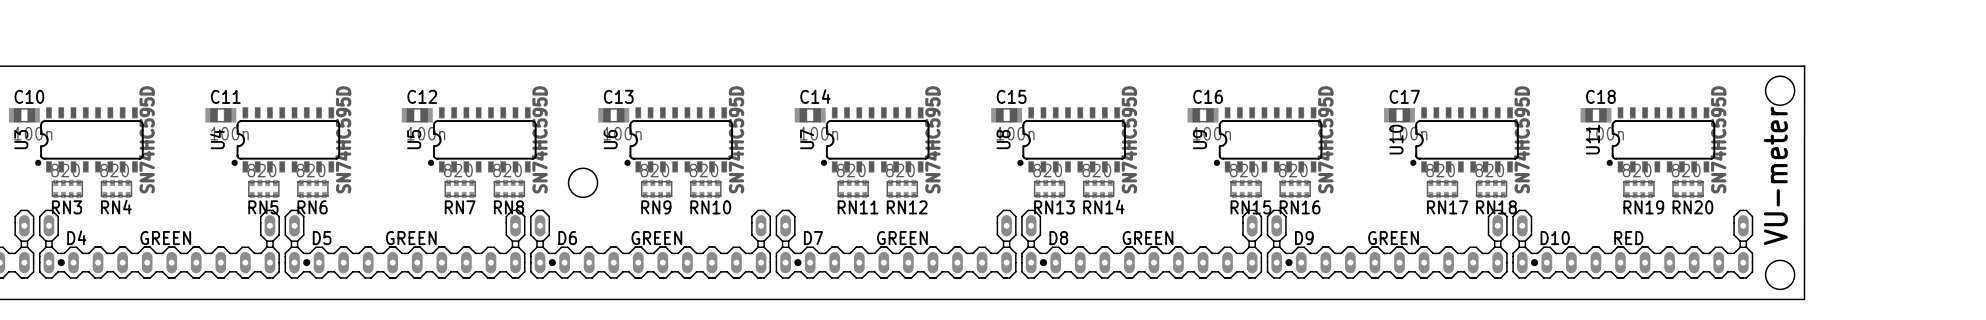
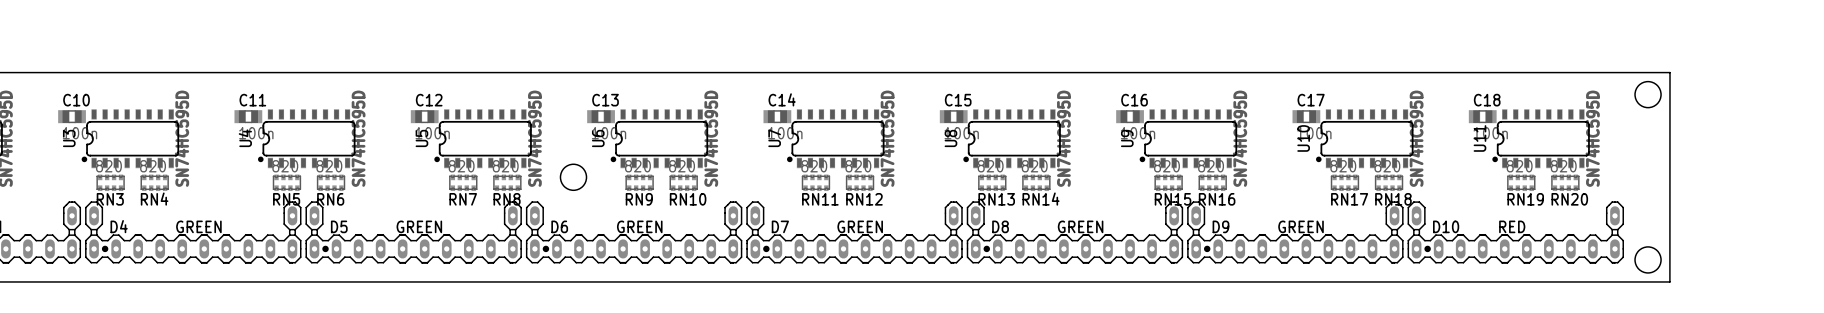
text: VU-meter (1775, 175) -> none

